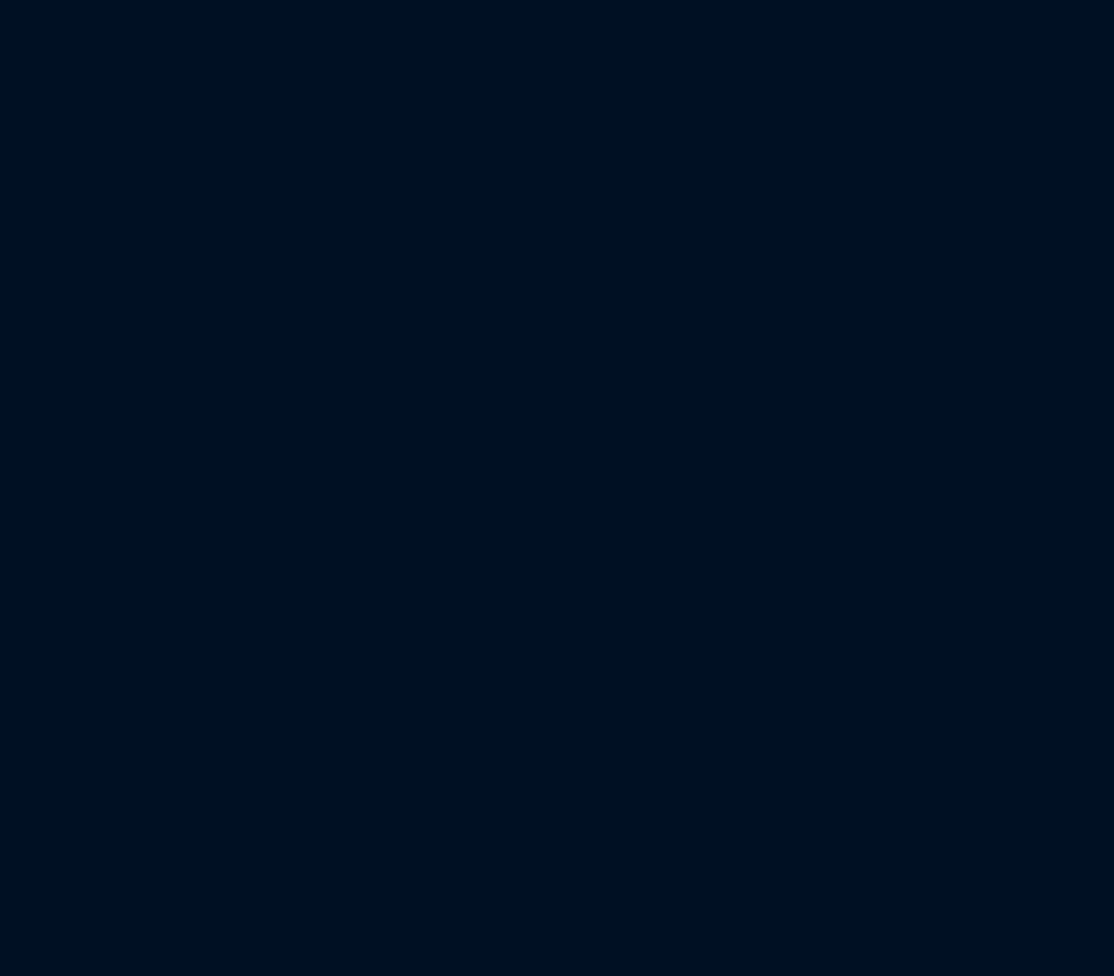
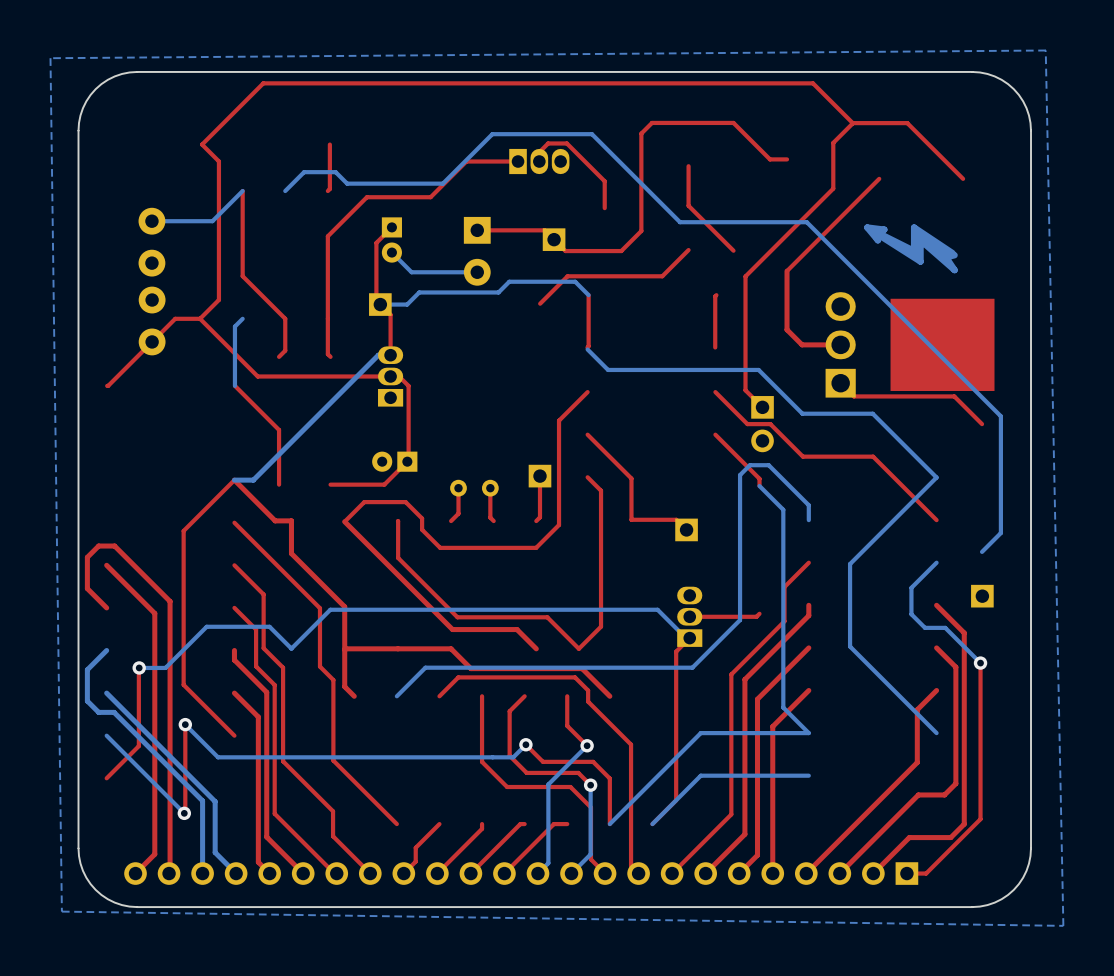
bottom zone outline: none -> (1045, 50) (50, 58) (61, 911) (1063, 925) (1045, 50)
board edge: none -> (972, 71) (137, 71) (114, 76) (95, 89) (82, 108) (78, 130) (78, 848) (82, 870) (95, 889) (114, 902) (137, 907) (972, 907) (994, 902) (1013, 889) (1026, 870) (1031, 848) (1031, 130) (1026, 108) (1013, 89) (994, 76) (972, 71)
top track: none -> (852, 123) (813, 83) (263, 83) (202, 144) (218, 161) (218, 299) (200, 318)
top track: none -> (329, 144) (329, 189) (327, 191)
top track: none -> (787, 159) (769, 159) (733, 122) (652, 122) (641, 133) (641, 231) (621, 251) (565, 251) (544, 230) (477, 230)
top track: none -> (518, 161) (466, 161) (430, 197) (366, 197) (327, 236) (327, 354) (330, 356)
top track: none -> (539, 161) (539, 152) (548, 143) (566, 143) (604, 181) (604, 208)
part: none -> (539, 161)
top track: none -> (688, 166) (688, 205) (733, 250)
top track: none -> (879, 178) (787, 271) (787, 329) (802, 344) (840, 344)
top track: none -> (963, 178) (907, 123) (853, 123) (833, 142) (833, 188) (745, 276) (745, 390) (762, 407)
top track: none -> (242, 191) (242, 276) (285, 318) (285, 350) (279, 356)
bottom track: none -> (242, 191) (212, 221) (151, 221)
bottom track: none -> (285, 191) (304, 172) (335, 172) (347, 183) (442, 183) (492, 134) (591, 134) (680, 222) (806, 222) (1000, 416) (1000, 533) (982, 551)
drawing: none -> [864, 224, 958, 274]
top track: none -> (391, 227) (376, 242) (376, 300) (390, 314) (390, 355)
part: none -> (391, 239)
part: none -> (554, 239)
part: none -> (151, 242)
top track: none -> (688, 250) (662, 276) (567, 276) (540, 303)
part: none -> (477, 251)
bottom track: none -> (391, 252) (411, 272) (477, 272)
top track: none -> (588, 295) (587, 347)
bottom track: none -> (588, 295) (575, 281) (509, 281) (498, 292) (419, 292) (407, 304) (380, 304)
top track: none -> (716, 295) (715, 347)
part: none -> (380, 304)
top track: none -> (200, 318) (175, 318) (107, 385)
top track: none -> (200, 318) (257, 376) (399, 376) (408, 385) (408, 460) (384, 484) (330, 484)
bottom track: none -> (242, 318) (234, 326) (234, 385)
part: none -> (152, 320)
part: none -> (910, 344)
bottom track: none -> (587, 349) (608, 369) (758, 369) (802, 413) (872, 413) (936, 477) (850, 564) (850, 646) (936, 733)
bottom track: none -> (390, 355) (378, 355) (253, 480) (234, 480)
part: none -> (390, 376)
top track: none -> (840, 383) (853, 396) (954, 396) (982, 424)
top track: none -> (234, 385) (279, 429) (279, 484)
top track: none -> (587, 392) (559, 420) (559, 525) (536, 547) (440, 547) (422, 529) (422, 518) (405, 502) (364, 502) (344, 521) (452, 629) (517, 629) (536, 648)
top track: none -> (715, 392) (747, 424) (770, 424) (802, 456) (873, 456) (936, 520)
part: none -> (762, 424)
top track: none -> (587, 434) (631, 478) (631, 519) (676, 519) (686, 529)
top track: none -> (715, 434) (759, 478) (759, 486)
part: none -> (394, 461)
top track: none -> (539, 476) (539, 517) (536, 521)
part: none -> (539, 476)
top track: none -> (587, 477) (601, 490) (601, 626) (578, 648) (547, 617) (457, 617) (398, 557) (398, 521)
bottom track: none -> (759, 486) (783, 509) (783, 707) (808, 733) (700, 733) (609, 824)
top track: none -> (458, 488) (458, 513) (451, 521)
part: none -> (474, 488)
top track: none -> (490, 488) (490, 517) (493, 521)
bottom track: none -> (808, 520) (808, 505) (768, 465) (749, 465) (740, 475) (740, 620) (692, 667) (425, 667) (396, 696)
top track: none -> (234, 522) (319, 608) (319, 666) (333, 680) (333, 760) (396, 824)
part: none -> (686, 529)
top track: none -> (808, 562) (784, 587) (784, 621) (731, 674) (731, 814) (672, 873)
bottom track: none -> (936, 562) (911, 587) (911, 614) (925, 627) (945, 627) (980, 663)
top track: none -> (106, 565) (154, 613) (154, 854) (135, 873)
top track: none -> (234, 565) (263, 594) (263, 648) (283, 667) (283, 761) (333, 811) (333, 836) (370, 873)
part: none -> (982, 596)
top track: none -> (808, 605) (808, 615) (744, 679) (744, 834) (705, 873)
top track: none -> (936, 605) (964, 632) (964, 824) (950, 837) (909, 837) (873, 873)
top track: none -> (106, 607) (87, 588) (87, 557) (98, 546) (114, 546) (170, 601) (169, 873)
top track: none -> (234, 607) (256, 629) (256, 666) (274, 685) (274, 813) (334, 873) (336, 873)
top track: none -> (759, 613) (756, 616) (689, 616)
part: none -> (689, 616)
top track: none -> (689, 638) (676, 651) (676, 800) (652, 824)
bottom track: none -> (689, 638) (685, 638) (657, 609) (330, 609) (291, 648) (269, 626) (206, 626) (165, 667) (139, 667)
top track: none -> (808, 647) (757, 699) (757, 855) (739, 873)
top track: none -> (936, 647) (955, 667) (955, 783) (944, 794) (918, 794) (839, 873)
top track: none -> (344, 649) (451, 648) (470, 668) (582, 668) (609, 696)
bottom track: none -> (106, 650) (87, 669) (87, 701) (98, 712) (114, 712) (202, 800) (202, 873)
top track: none -> (234, 650) (234, 660) (266, 692) (266, 837) (303, 873)
top track: none -> (980, 663) (980, 819) (926, 873) (906, 873)
via: none -> (980, 663)
top track: none -> (139, 667) (138, 746) (106, 778)
via: none -> (139, 667)
top track: none -> (808, 690) (772, 726) (772, 873)
top track: none -> (936, 690) (917, 709) (917, 762) (806, 873)
bottom track: none -> (106, 693) (215, 801) (215, 852) (236, 873)
top track: none -> (234, 693) (258, 717) (258, 862) (269, 873)
top track: none -> (354, 696) (344, 686) (344, 606) (291, 553) (291, 520) (275, 520) (234, 480) (183, 530) (183, 684) (234, 735)
top track: none -> (439, 696) (458, 677) (575, 677) (588, 690) (588, 701) (631, 744) (631, 865) (638, 873)
top track: none -> (482, 696) (482, 761) (507, 787) (570, 787) (590, 807) (590, 859) (605, 873)
top track: none -> (524, 696) (509, 711) (509, 755) (526, 772) (578, 772) (590, 785)
top track: none -> (567, 696) (567, 725) (587, 745)
top track: none -> (185, 724) (184, 813)
bottom track: none -> (185, 724) (218, 757) (513, 757) (525, 744)
via: none -> (185, 724)
bottom track: none -> (106, 735) (184, 813)
top track: none -> (525, 744) (543, 761) (593, 761) (609, 778) (609, 824)
via: none -> (525, 744)
bottom track: none -> (587, 745) (548, 784) (548, 863) (537, 873)
via: none -> (587, 745)
bottom track: none -> (808, 775) (700, 775) (652, 824)
bottom track: none -> (590, 785) (590, 854) (571, 873)
via: none -> (590, 785)
via: none -> (184, 813)
top track: none -> (439, 824) (415, 847) (415, 861) (403, 873)
top track: none -> (482, 824) (482, 828) (437, 873)
top track: none -> (524, 824) (520, 824) (470, 873)
top track: none -> (567, 824) (553, 824) (504, 873)
part: none -> (521, 873)

